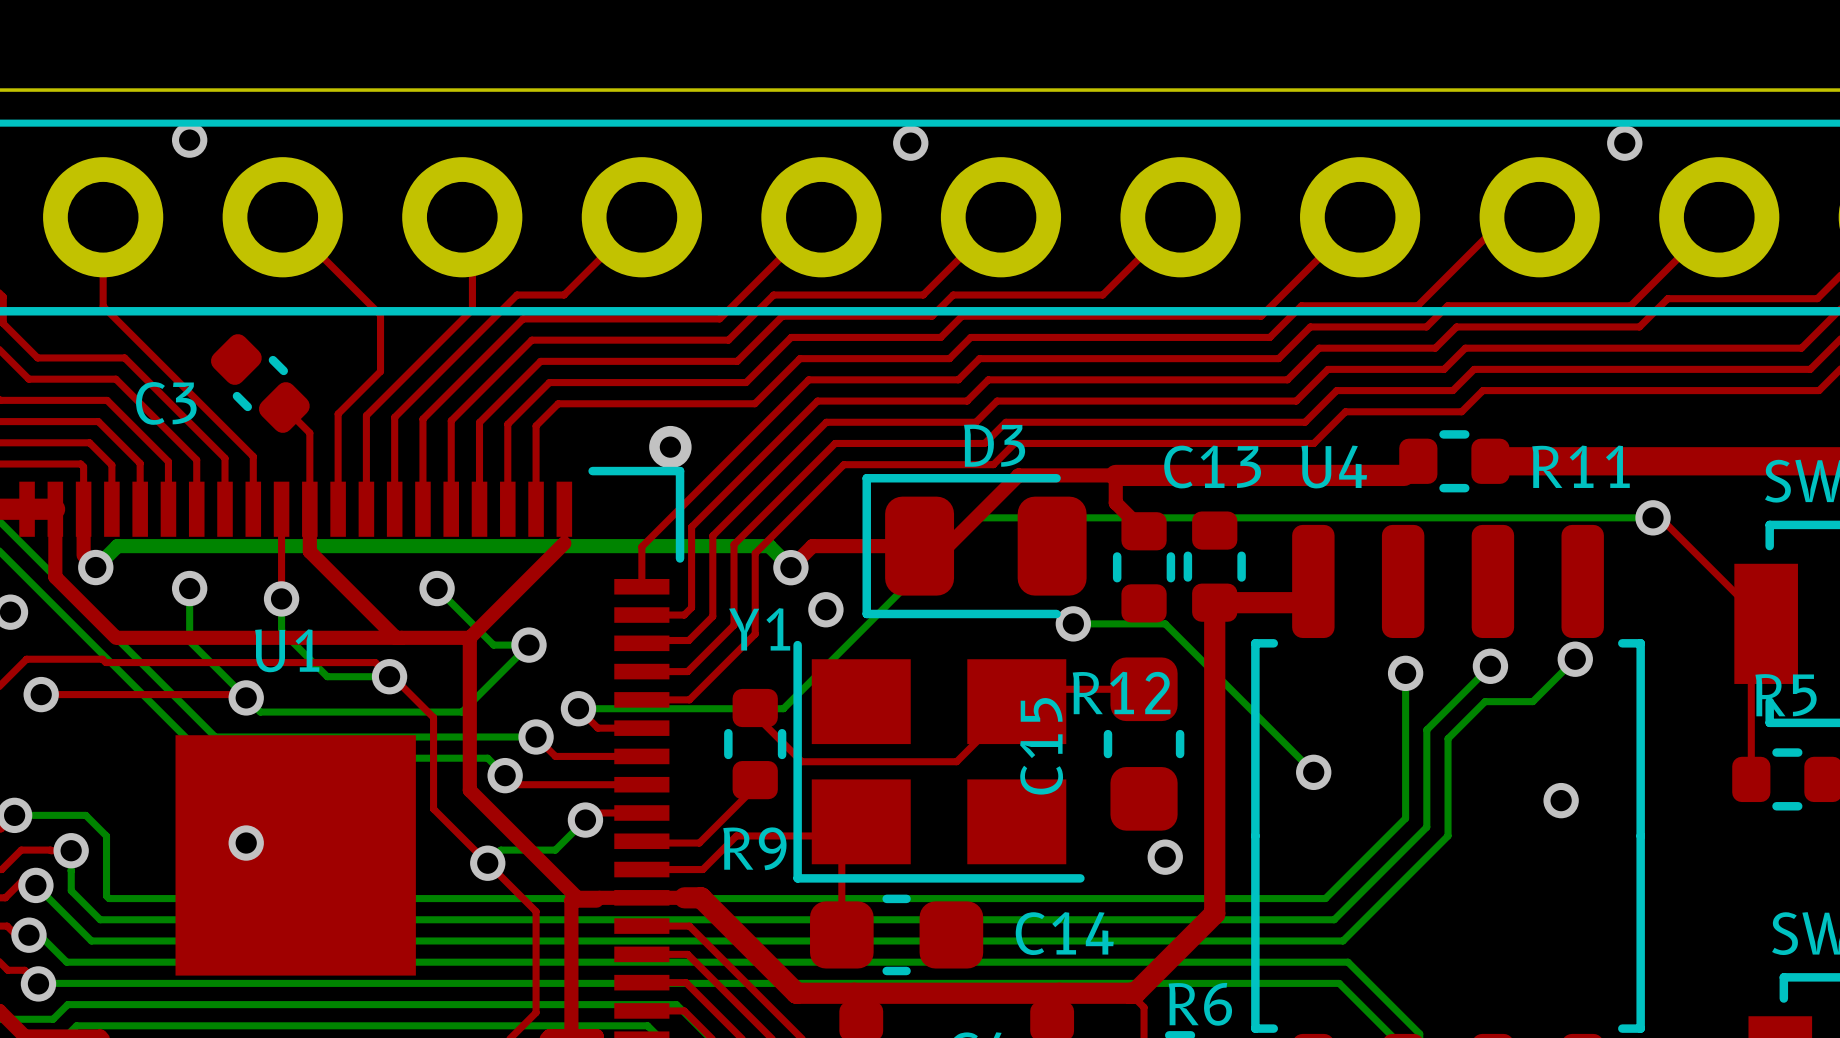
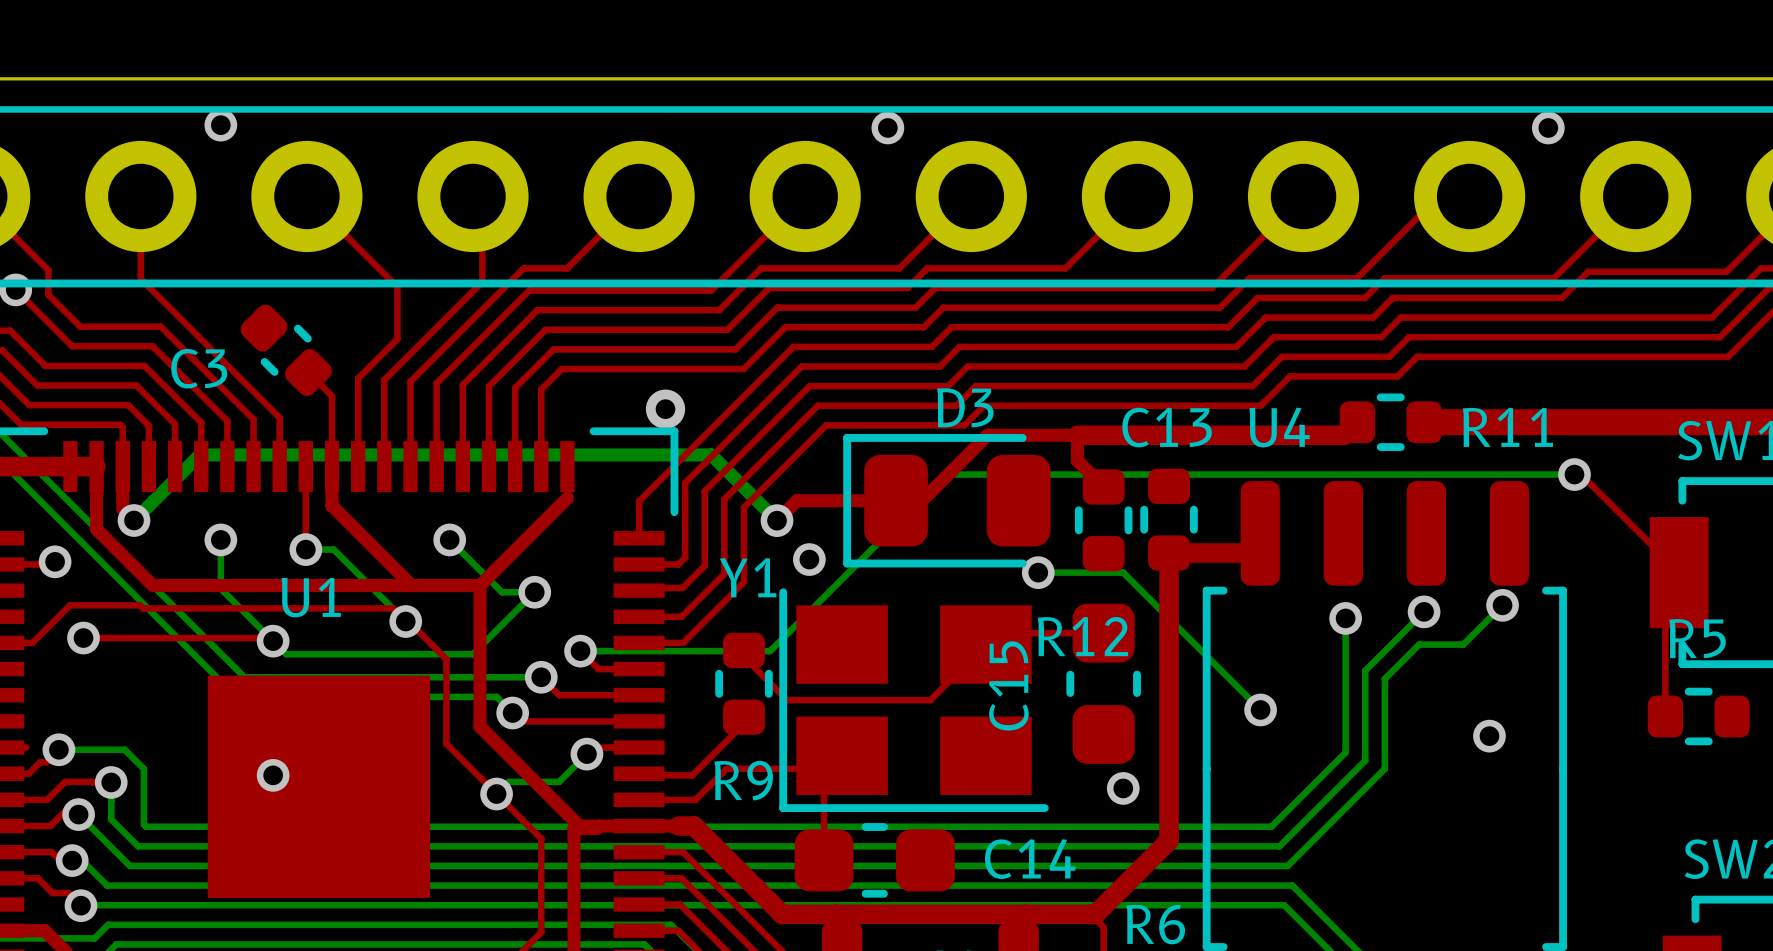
bottom track: (117, 546) (769, 546) -> (154, 500) (199, 454) (711, 454) (757, 500)
bottom track: (281, 598) (281, 630) (327, 676) (389, 676) -> (305, 549) (333, 549) (405, 621)

